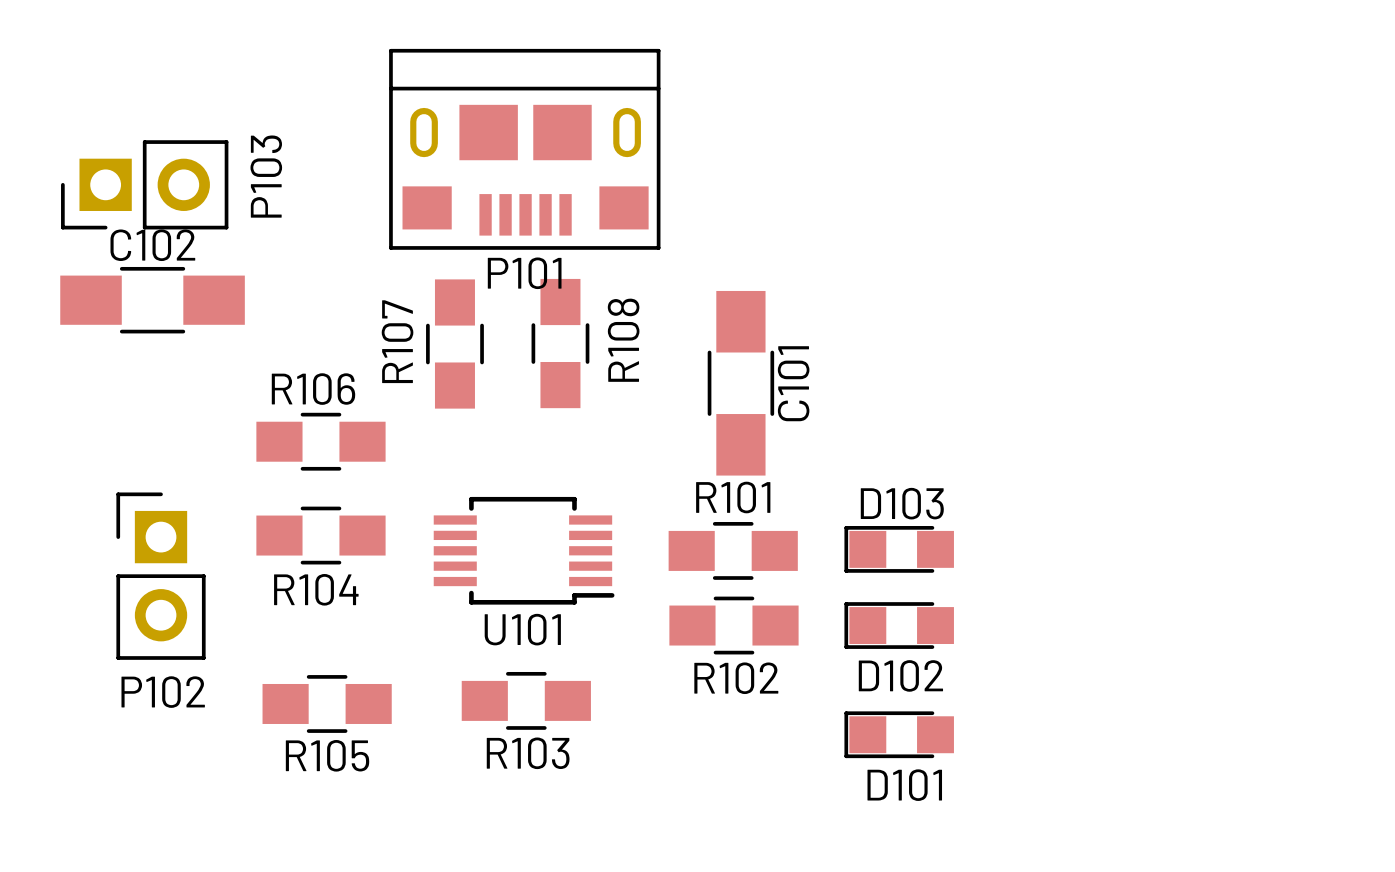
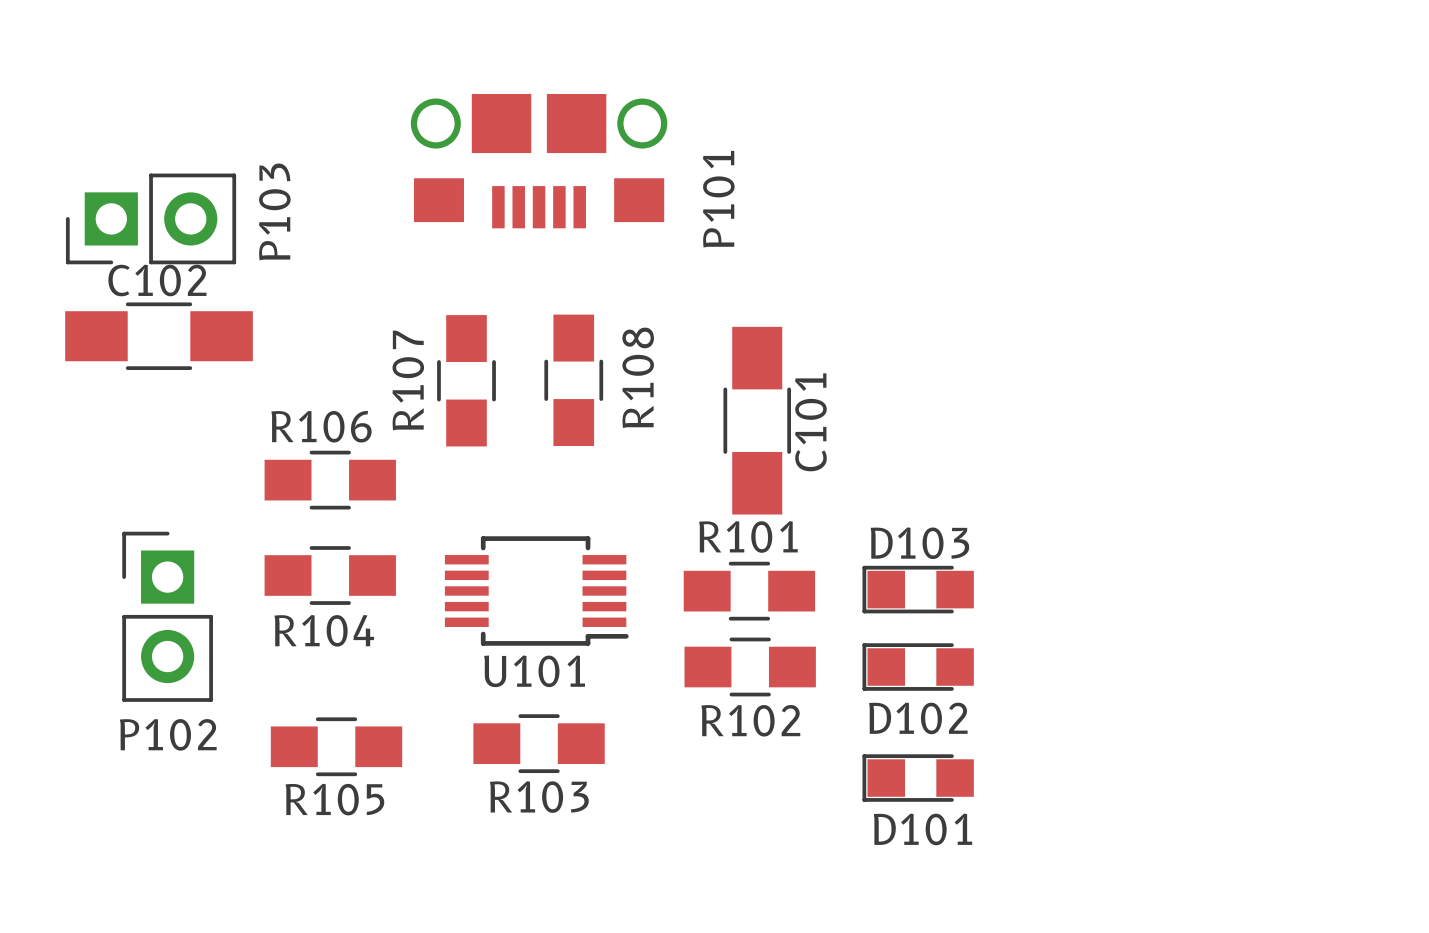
P101 footprint: [389, 48, 661, 250] -> [410, 93, 668, 229]
P101 name position: P101 (524, 273) -> P101 (718, 199)

